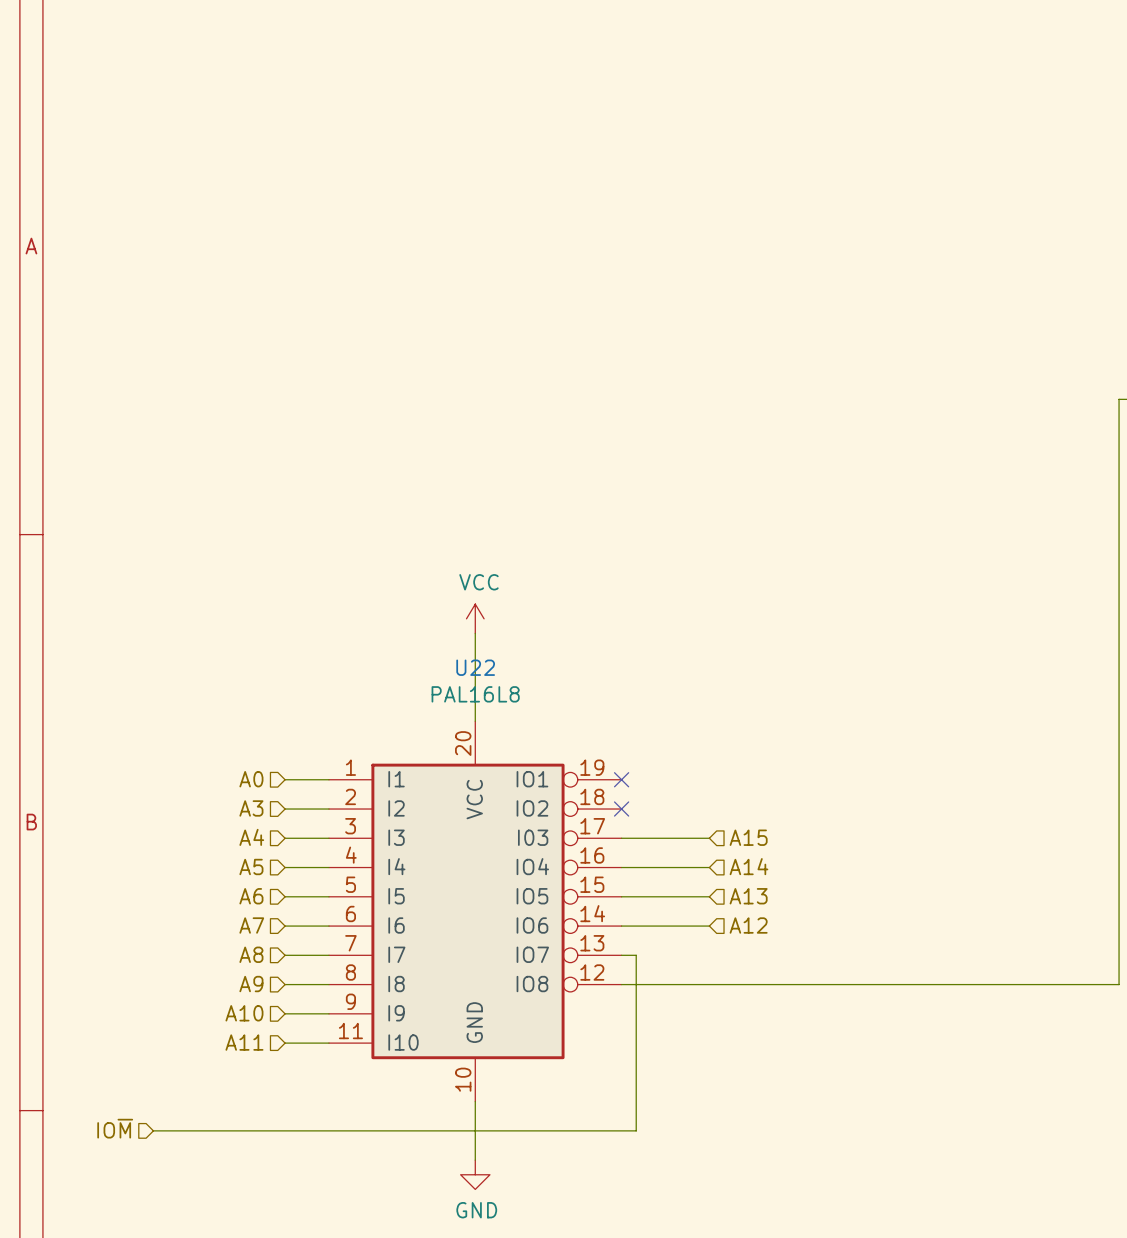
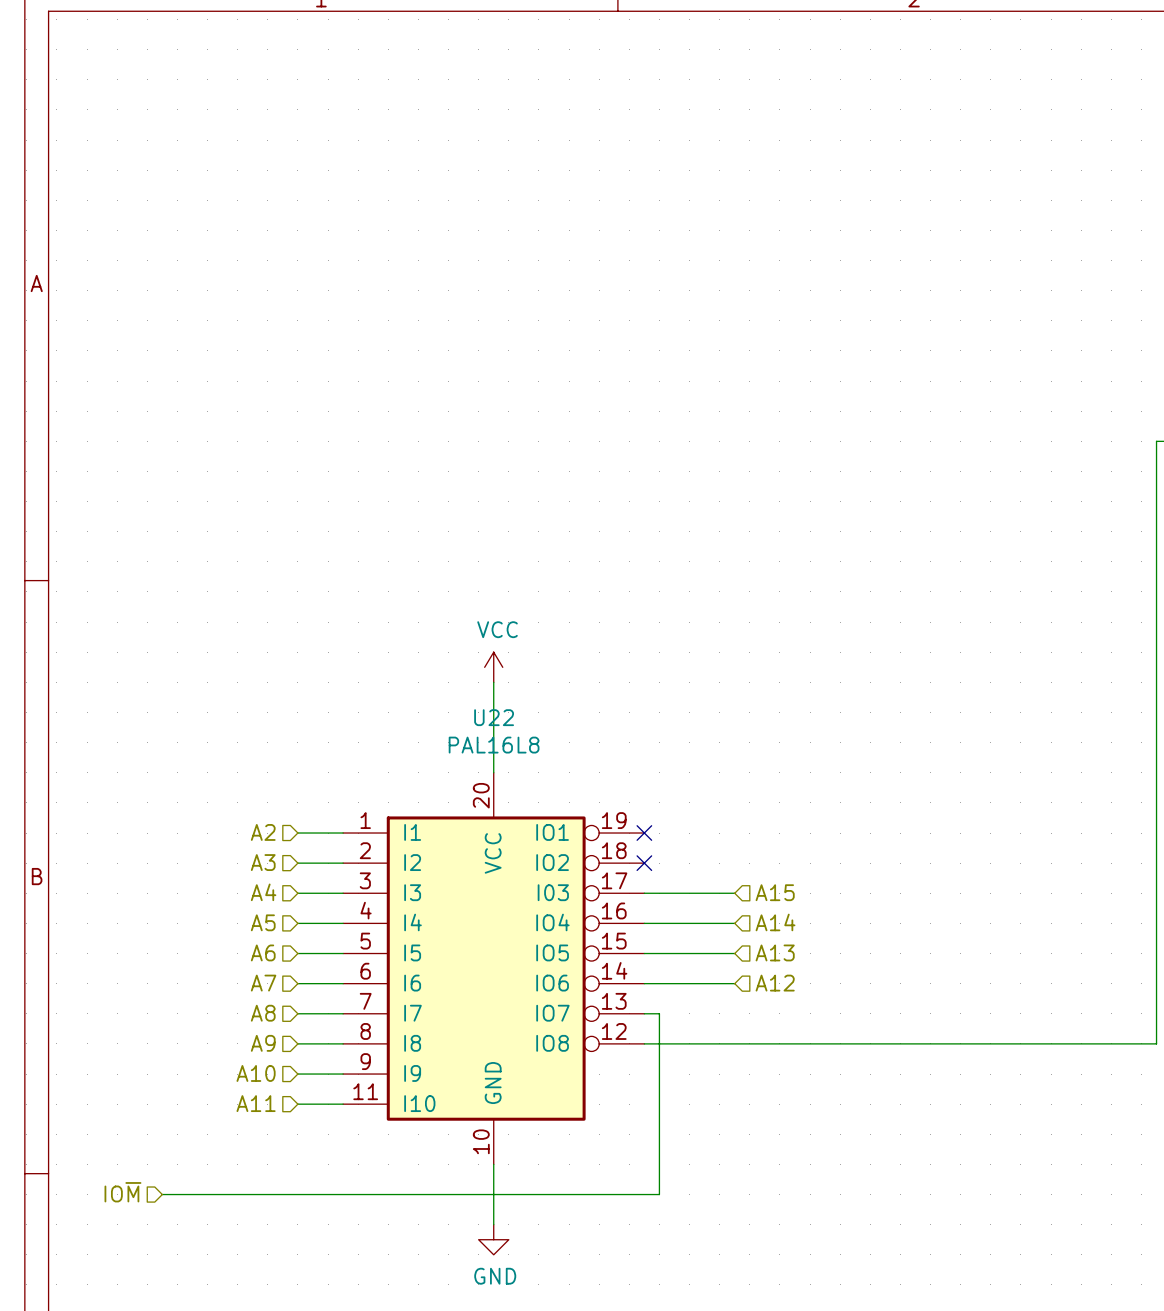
hierarchical label: A0 (251, 779) -> A2 (263, 832)

